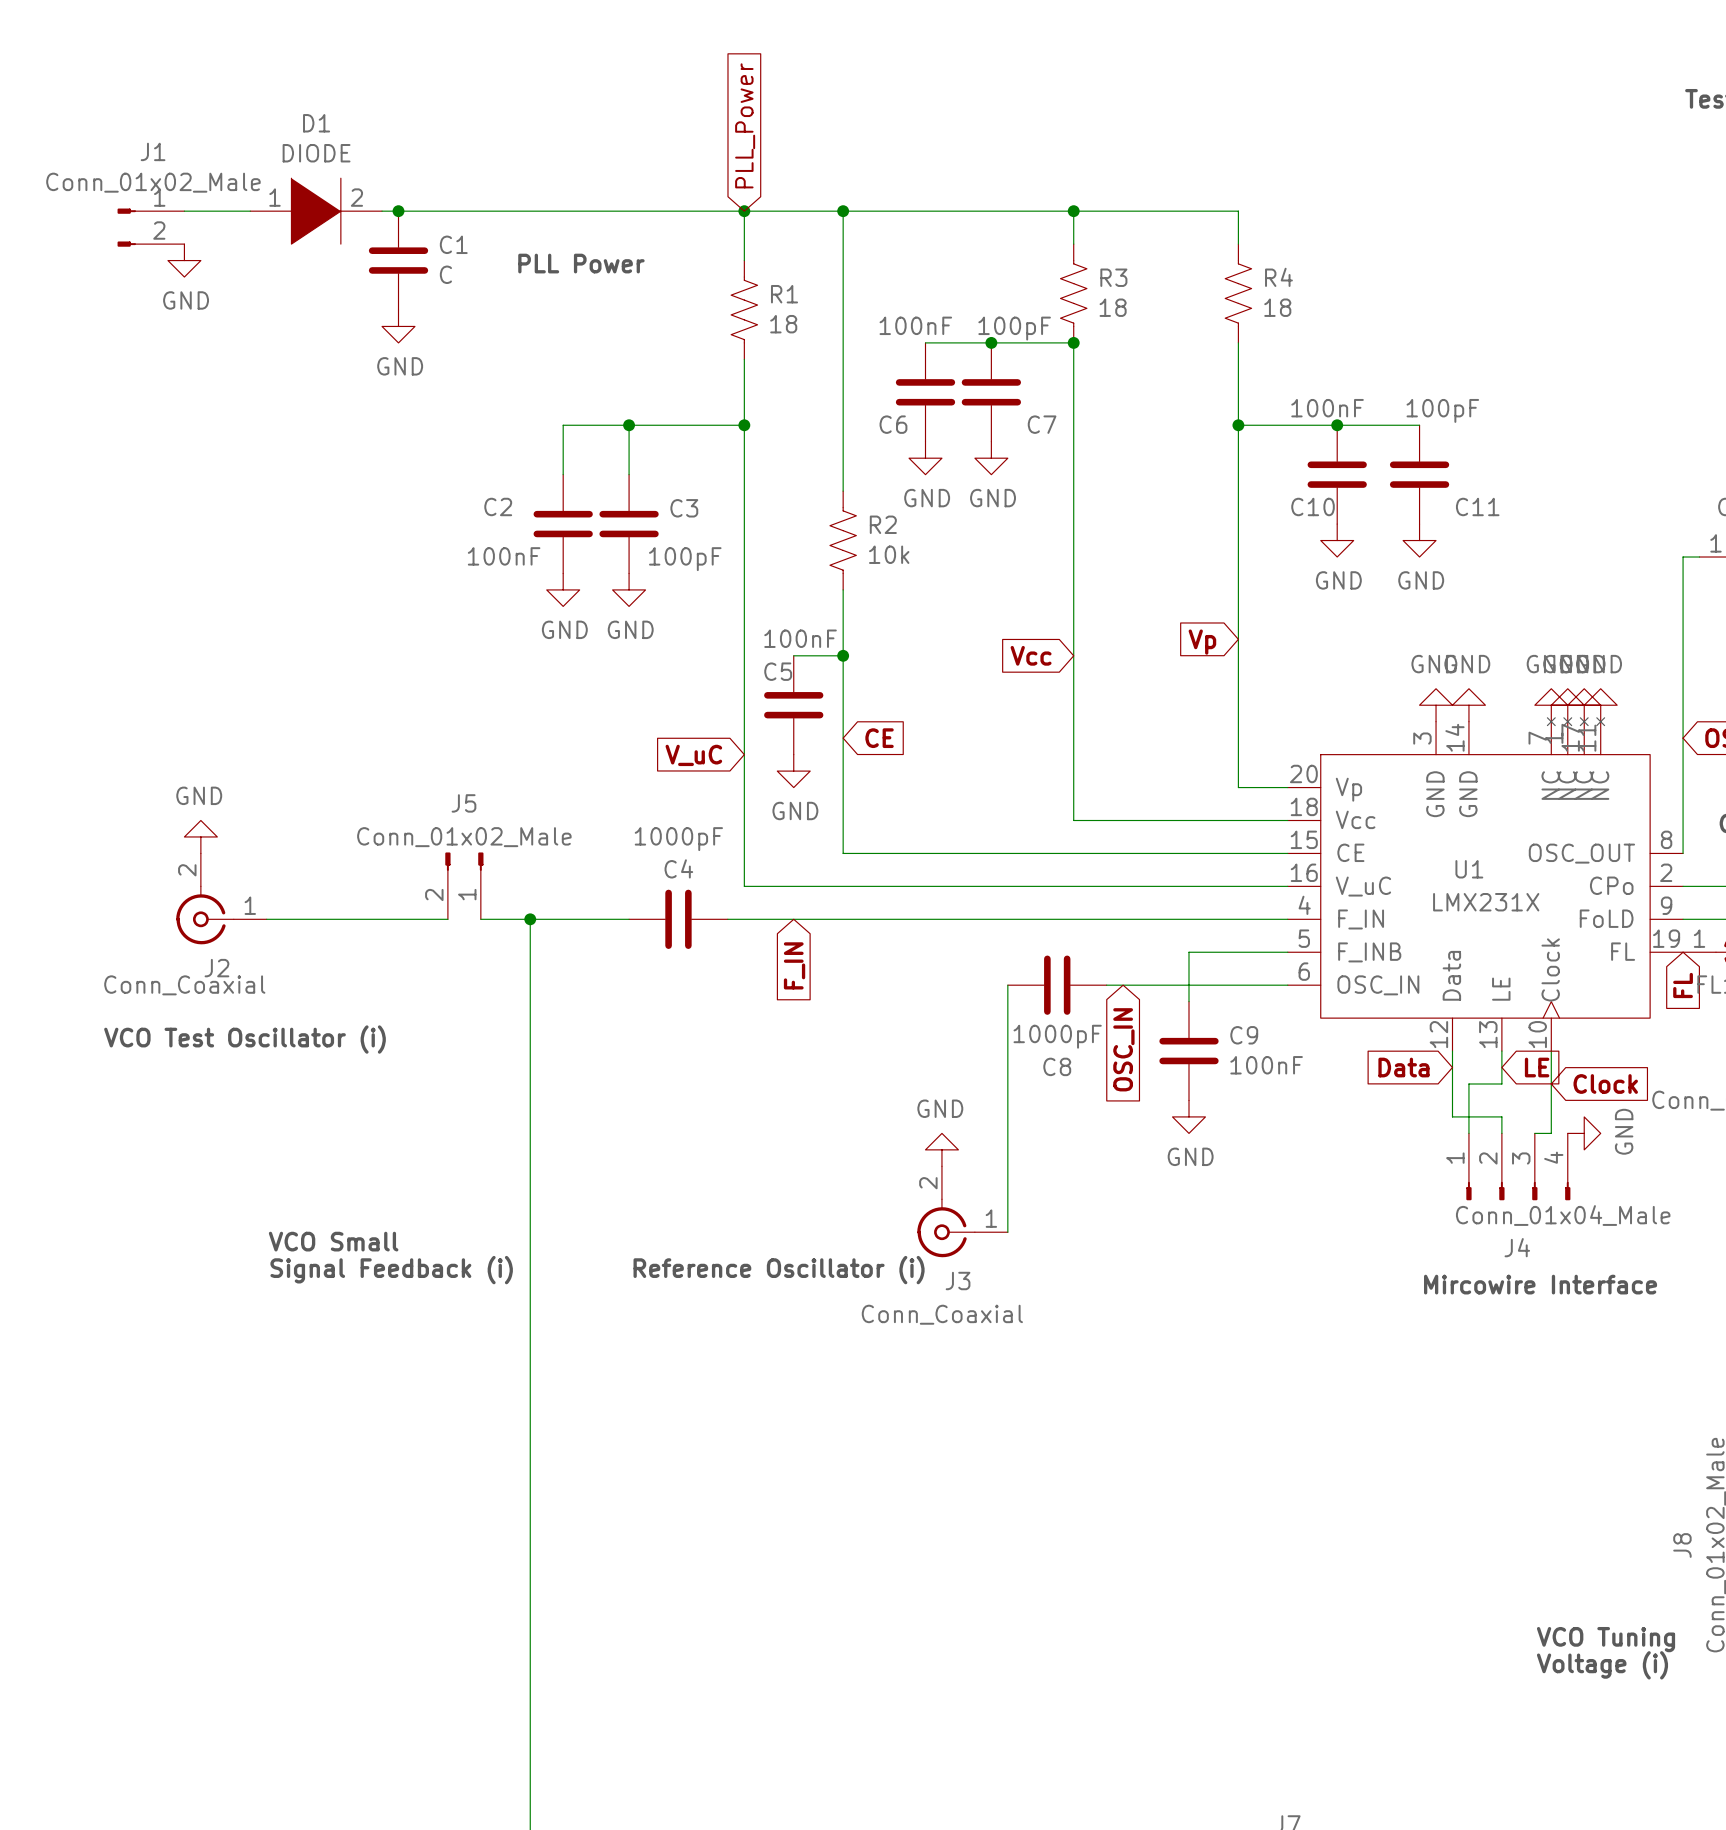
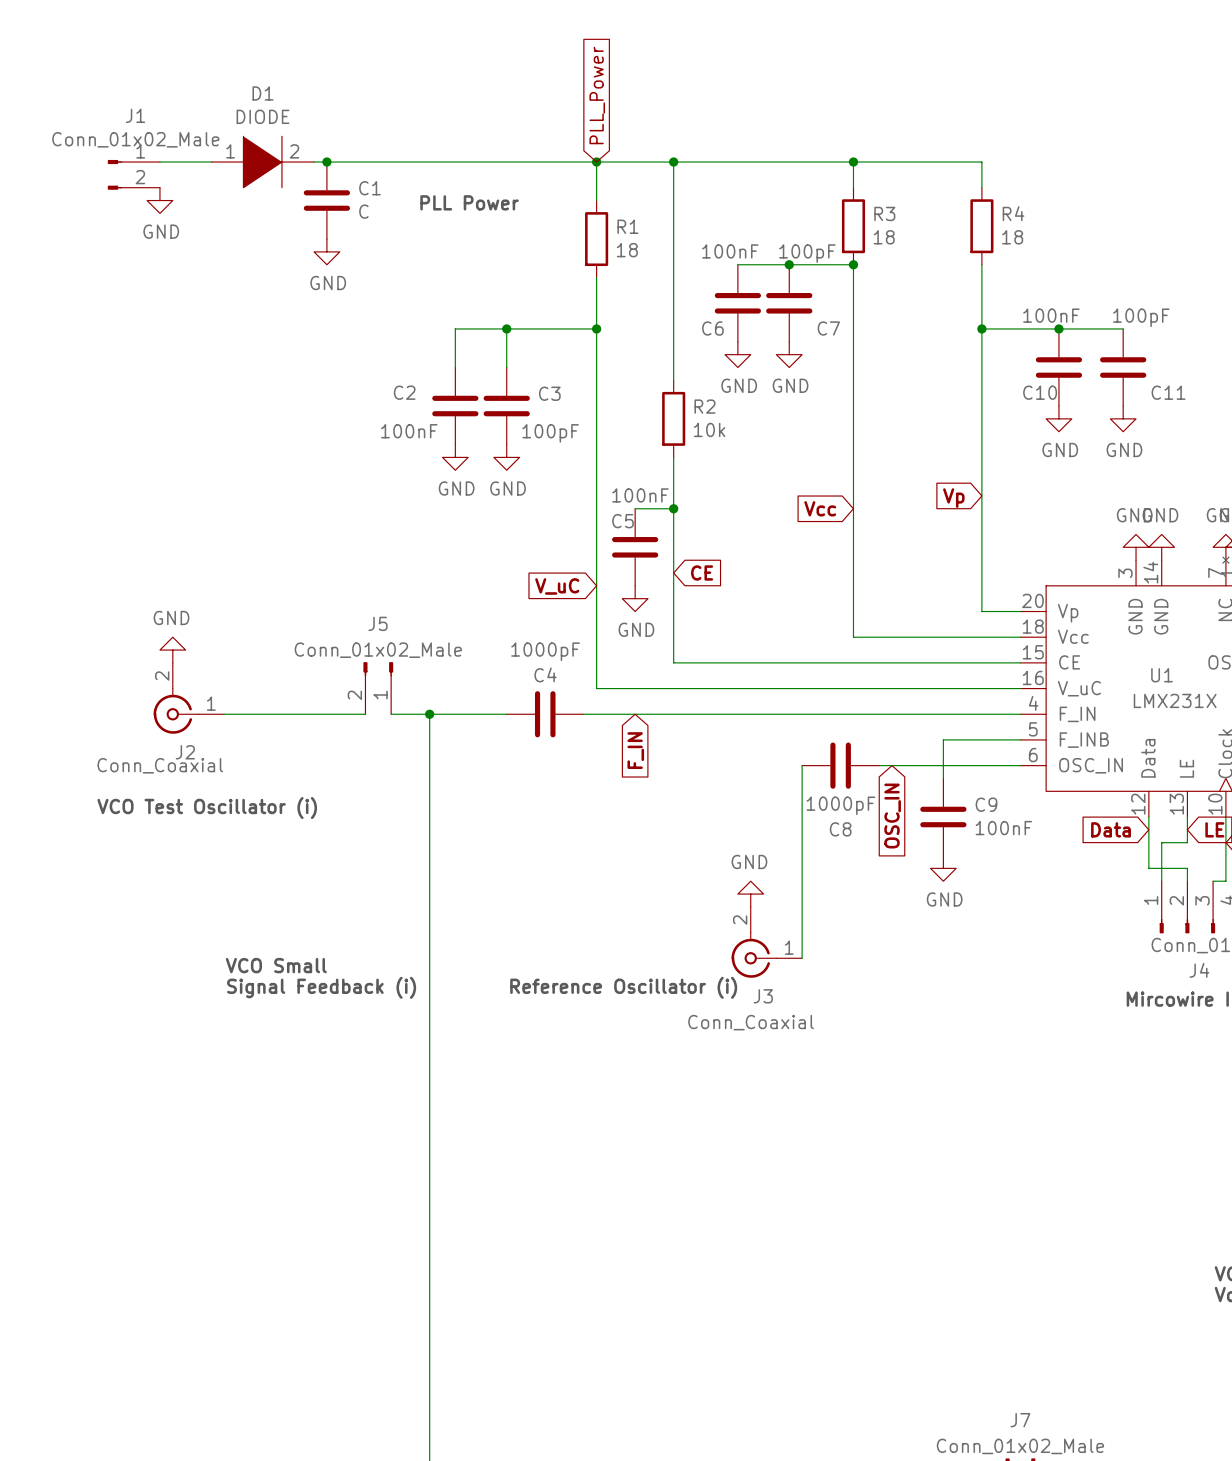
R3 symbol: [1060, 244, 1087, 343] -> [841, 187, 866, 265]
R4 symbol: [1225, 244, 1252, 343] -> [970, 187, 994, 265]
R1 symbol: [731, 260, 758, 360] -> [585, 200, 609, 278]
R2 symbol: [829, 491, 857, 590] -> [662, 380, 686, 458]

